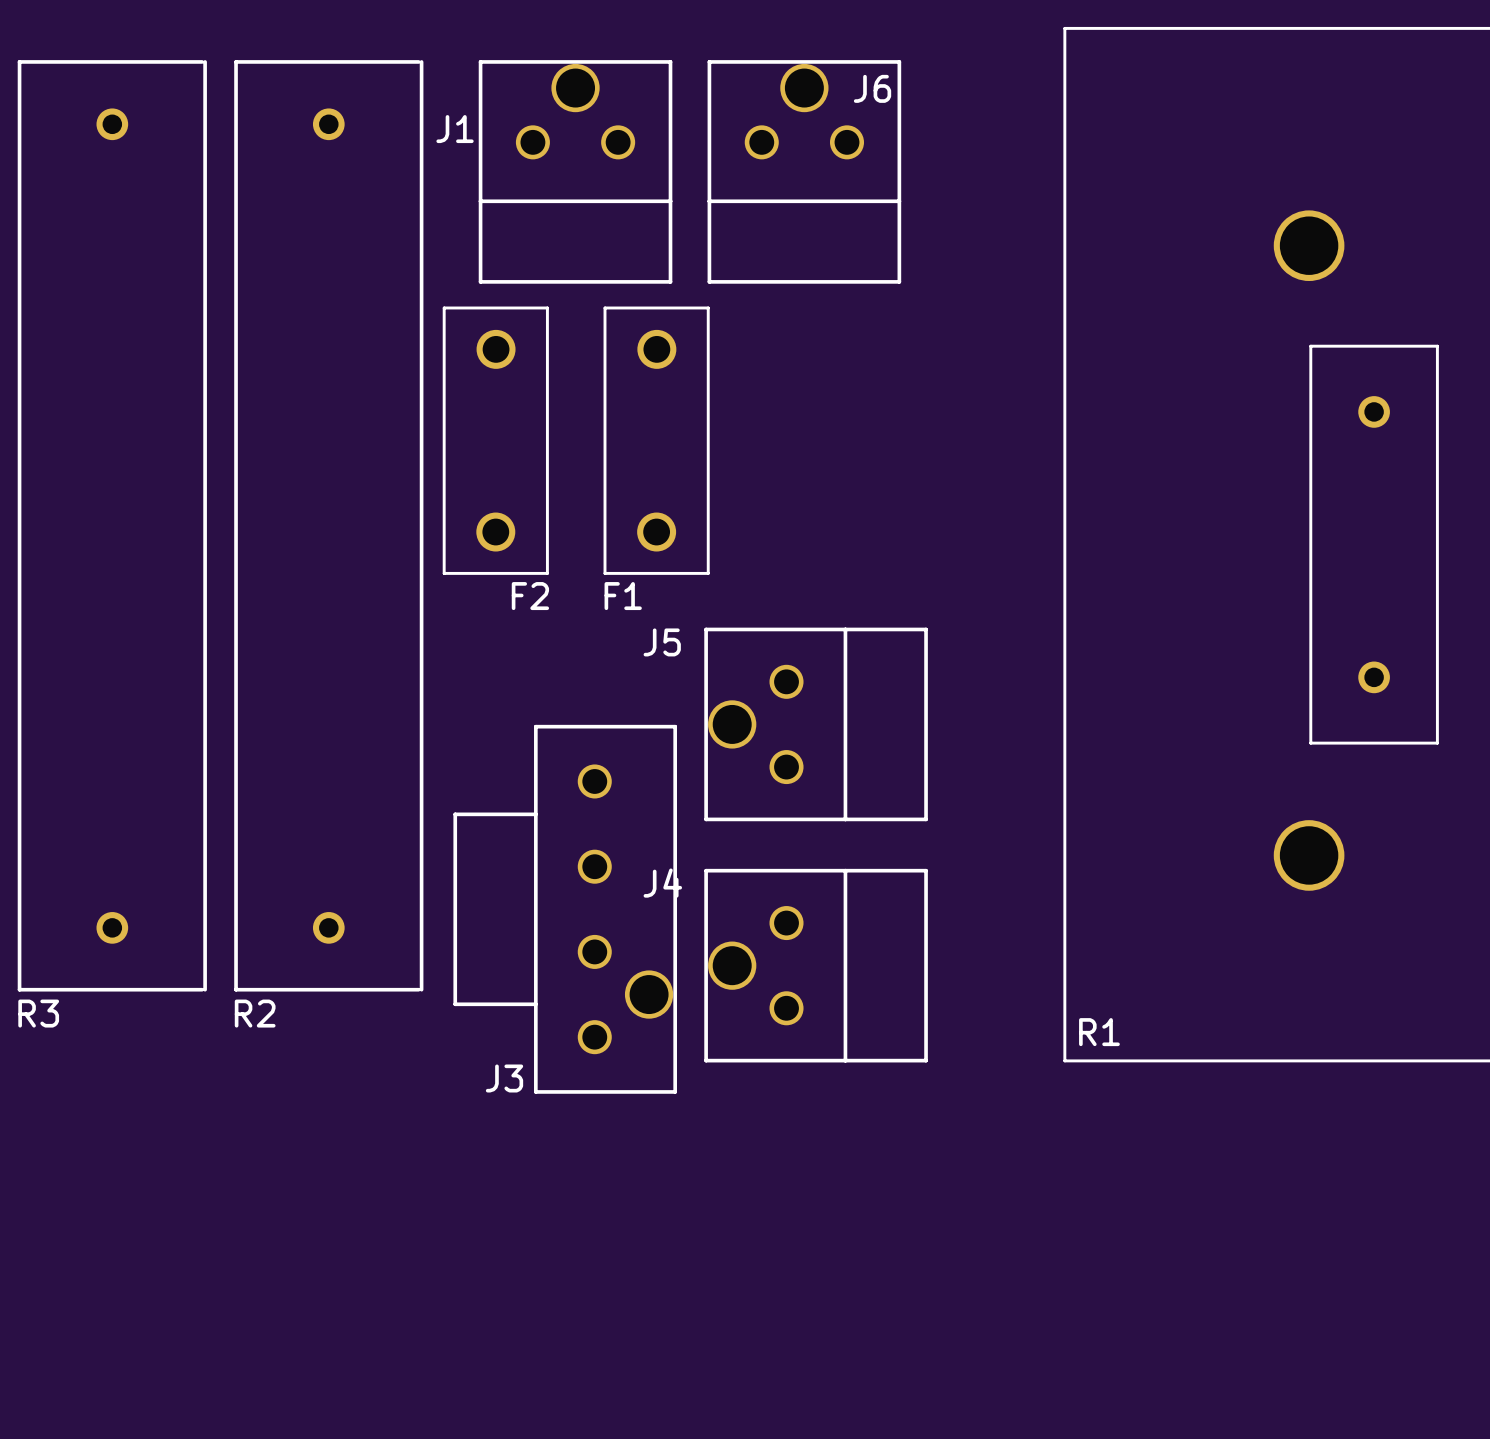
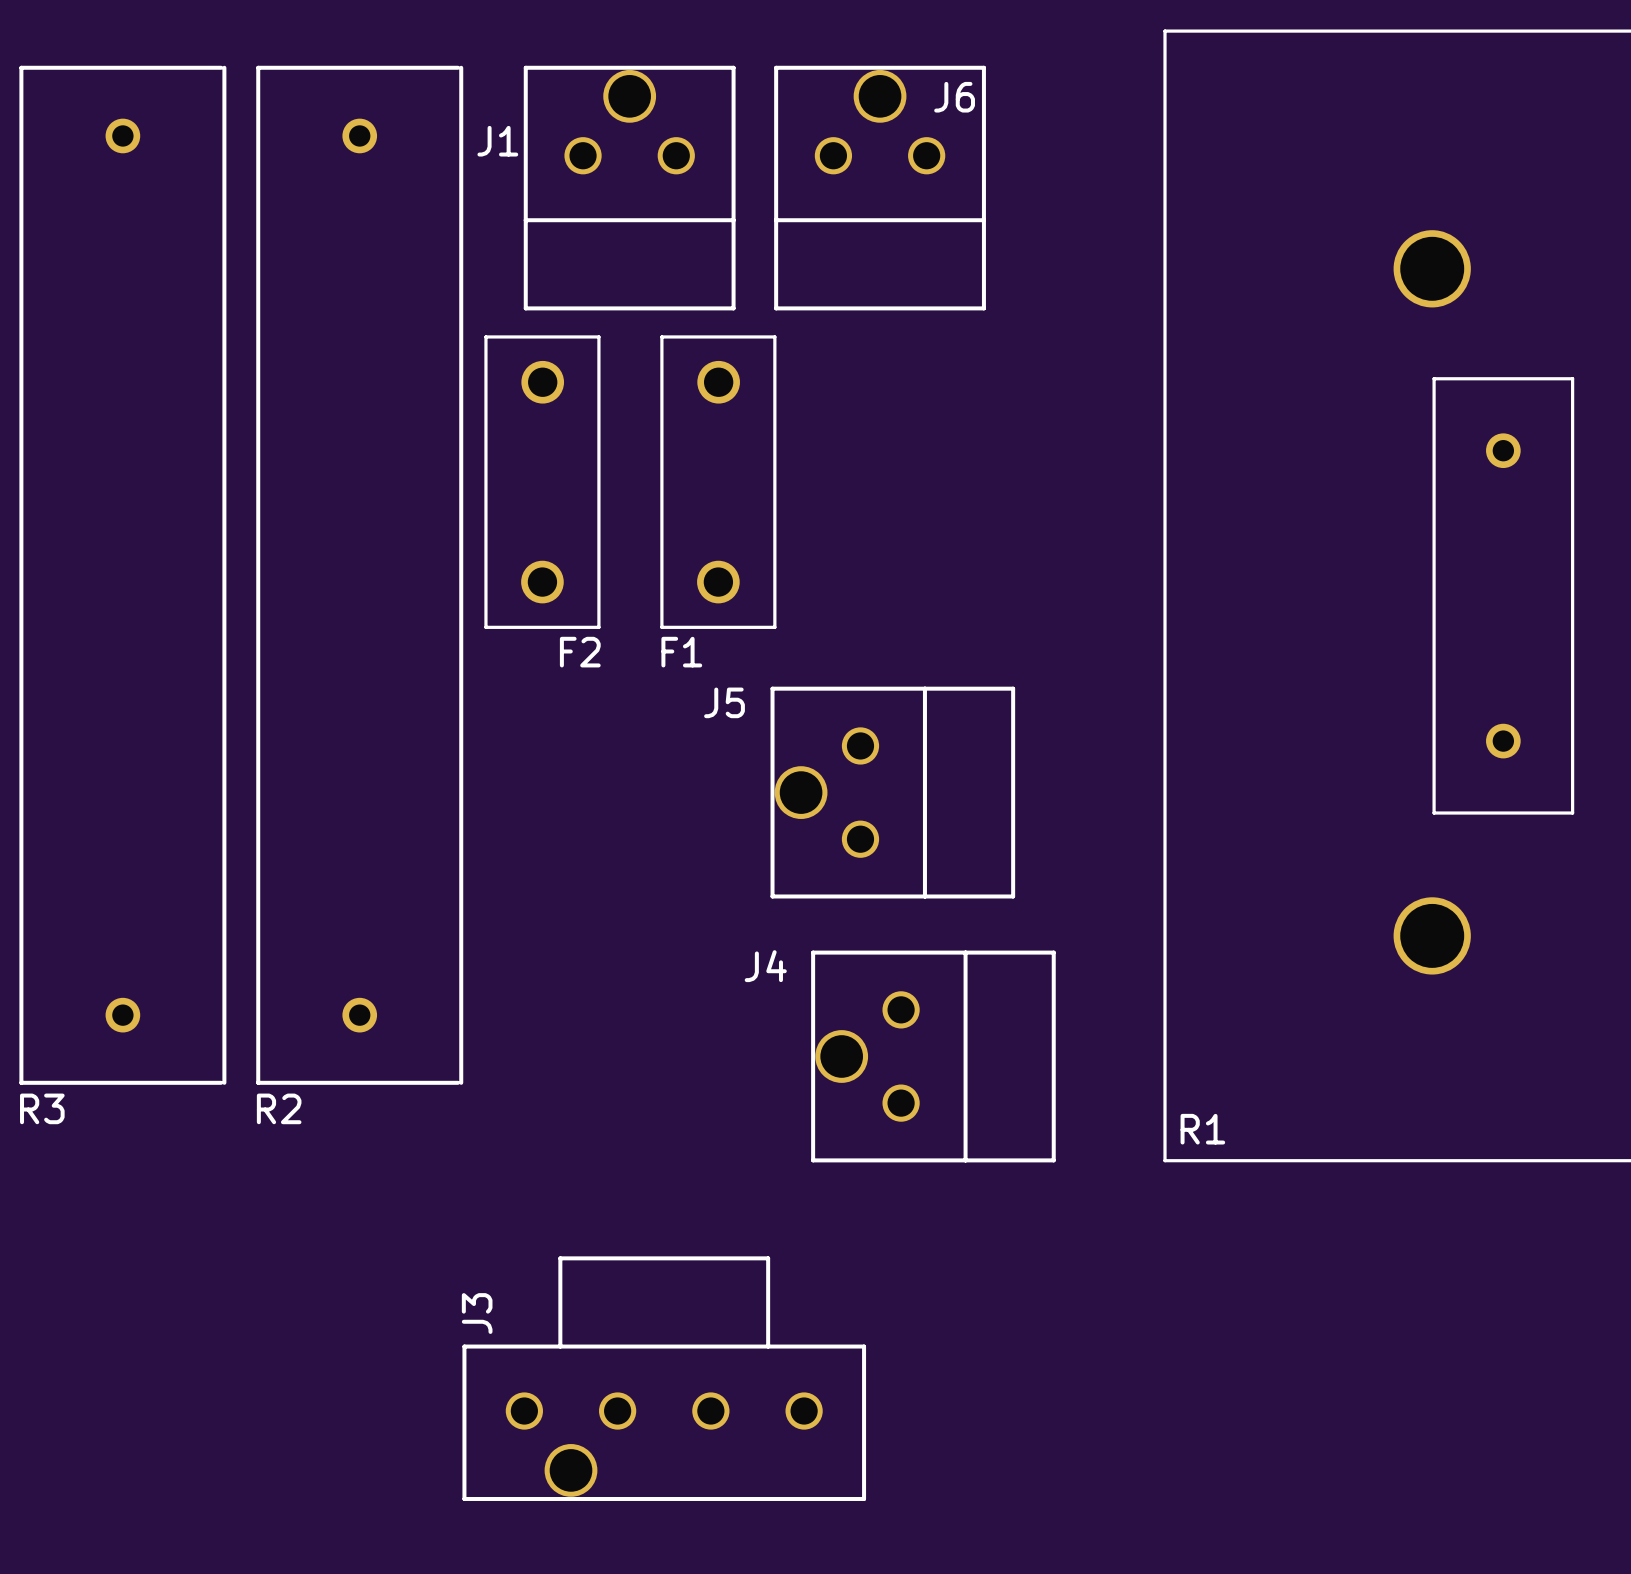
J3 rotation: 0° (565, 909) -> 90° clockwise (664, 1378)
J3 position: (565, 909) -> (664, 1378)
J4 position: (816, 965) -> (933, 1056)

